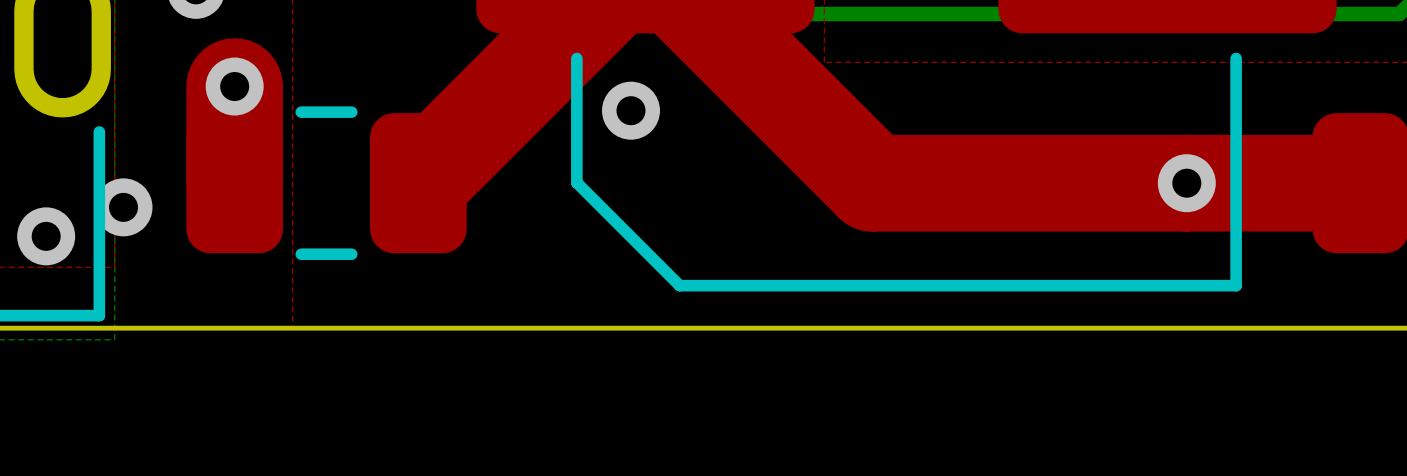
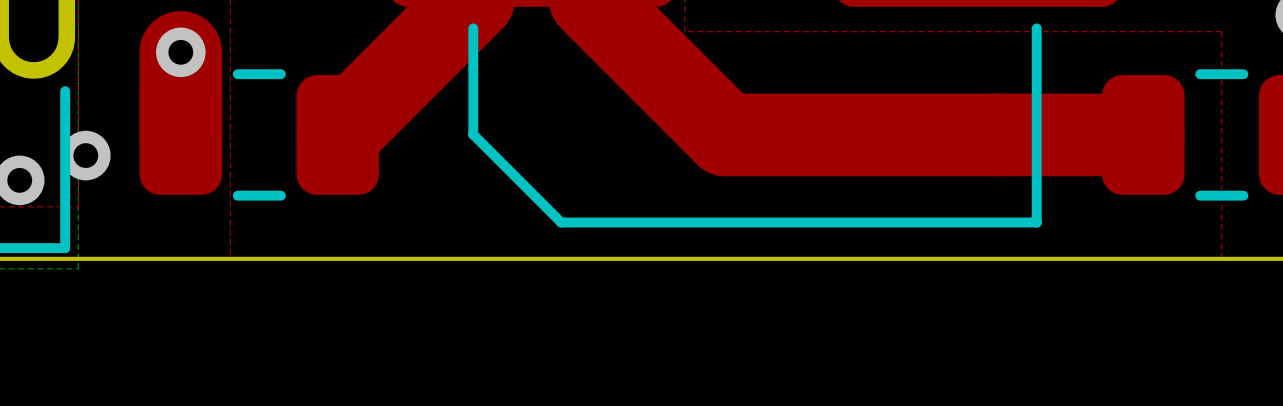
via: (630, 110) -> none
via: (1186, 183) -> none

